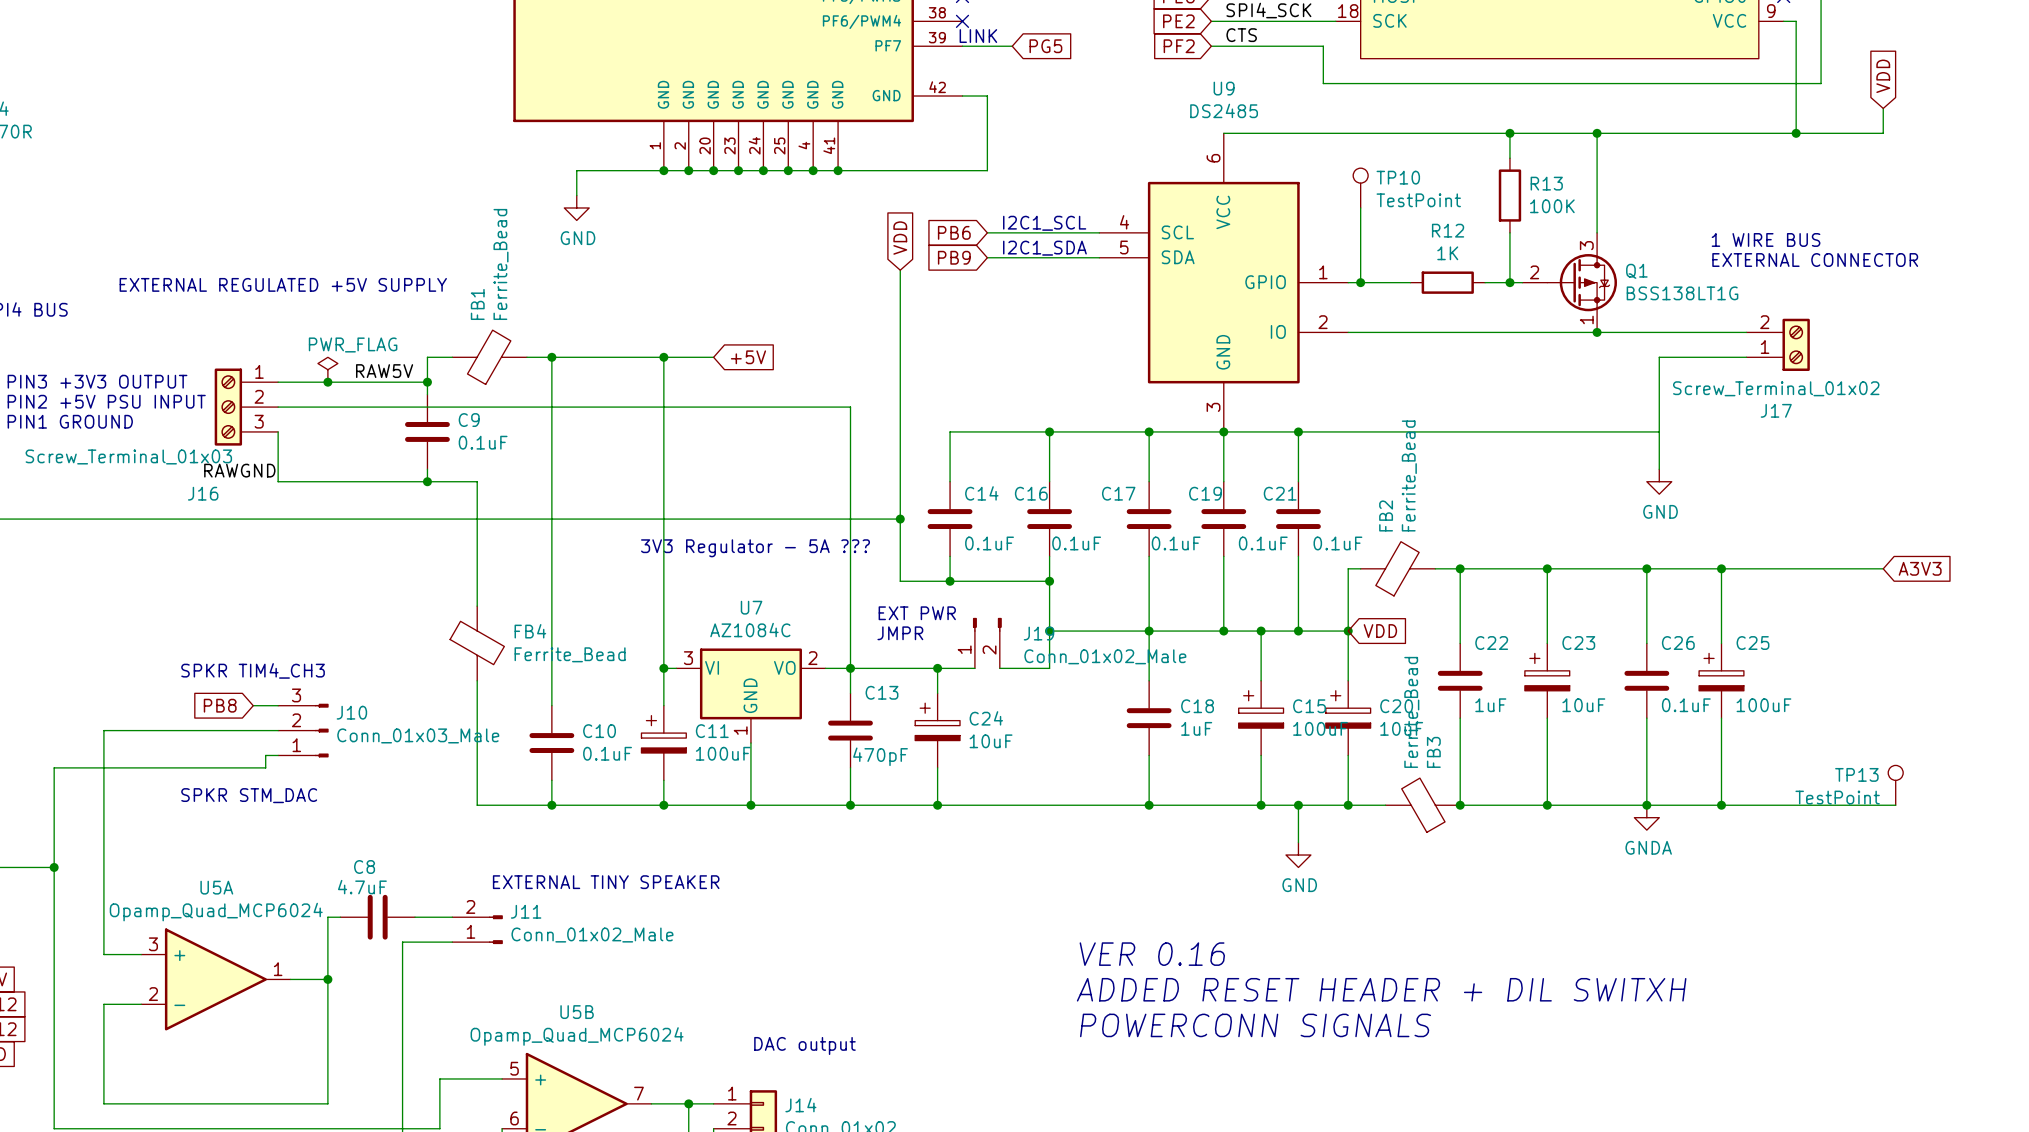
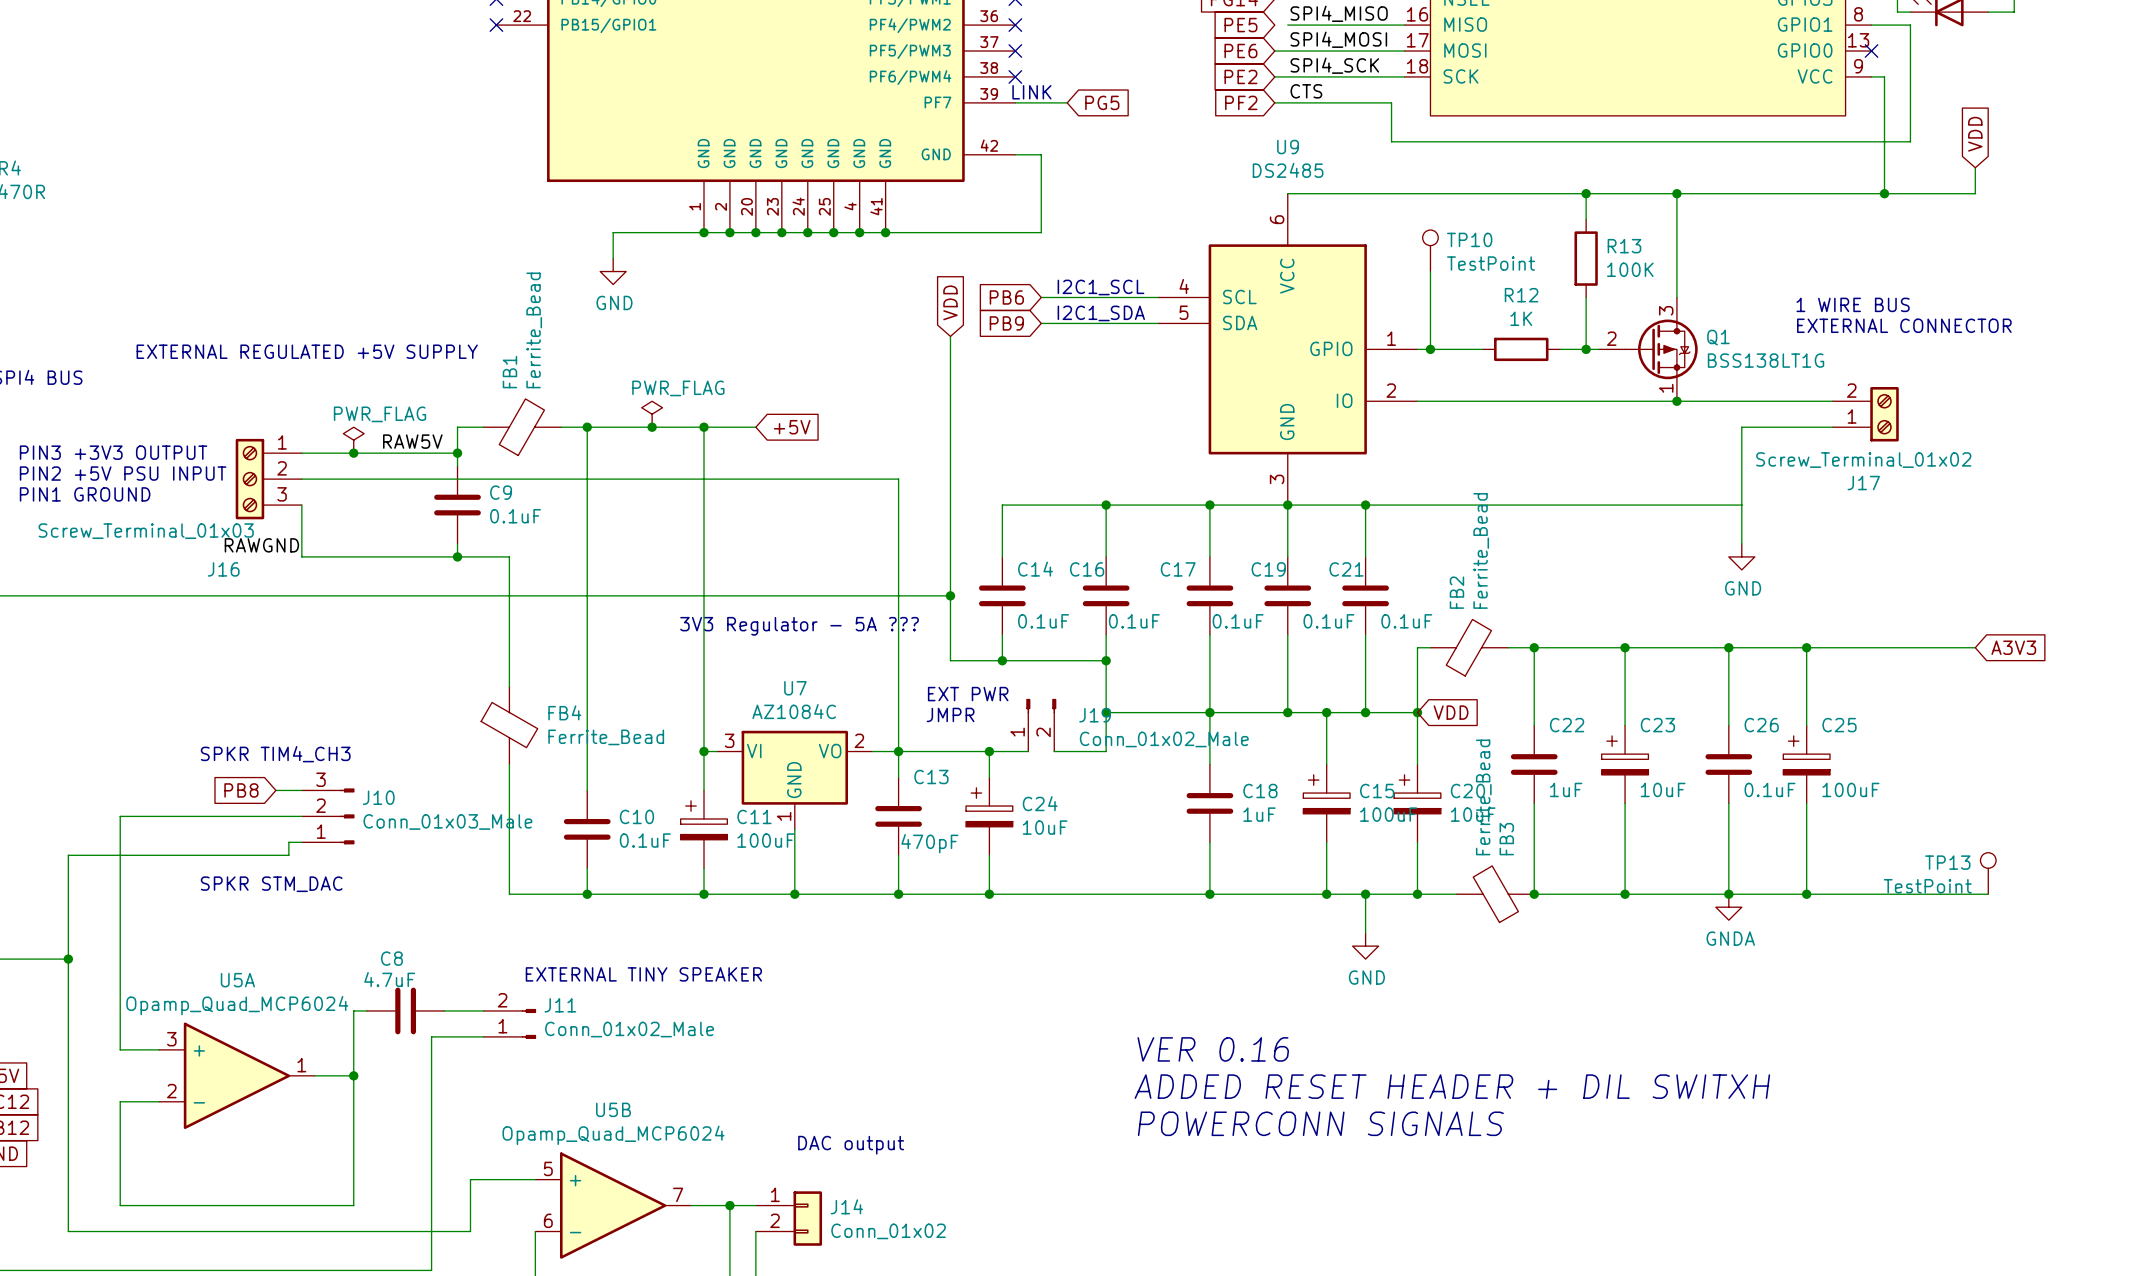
power symbol: none -> PWR_FLAG (652, 414)
junction: none -> (652, 427)

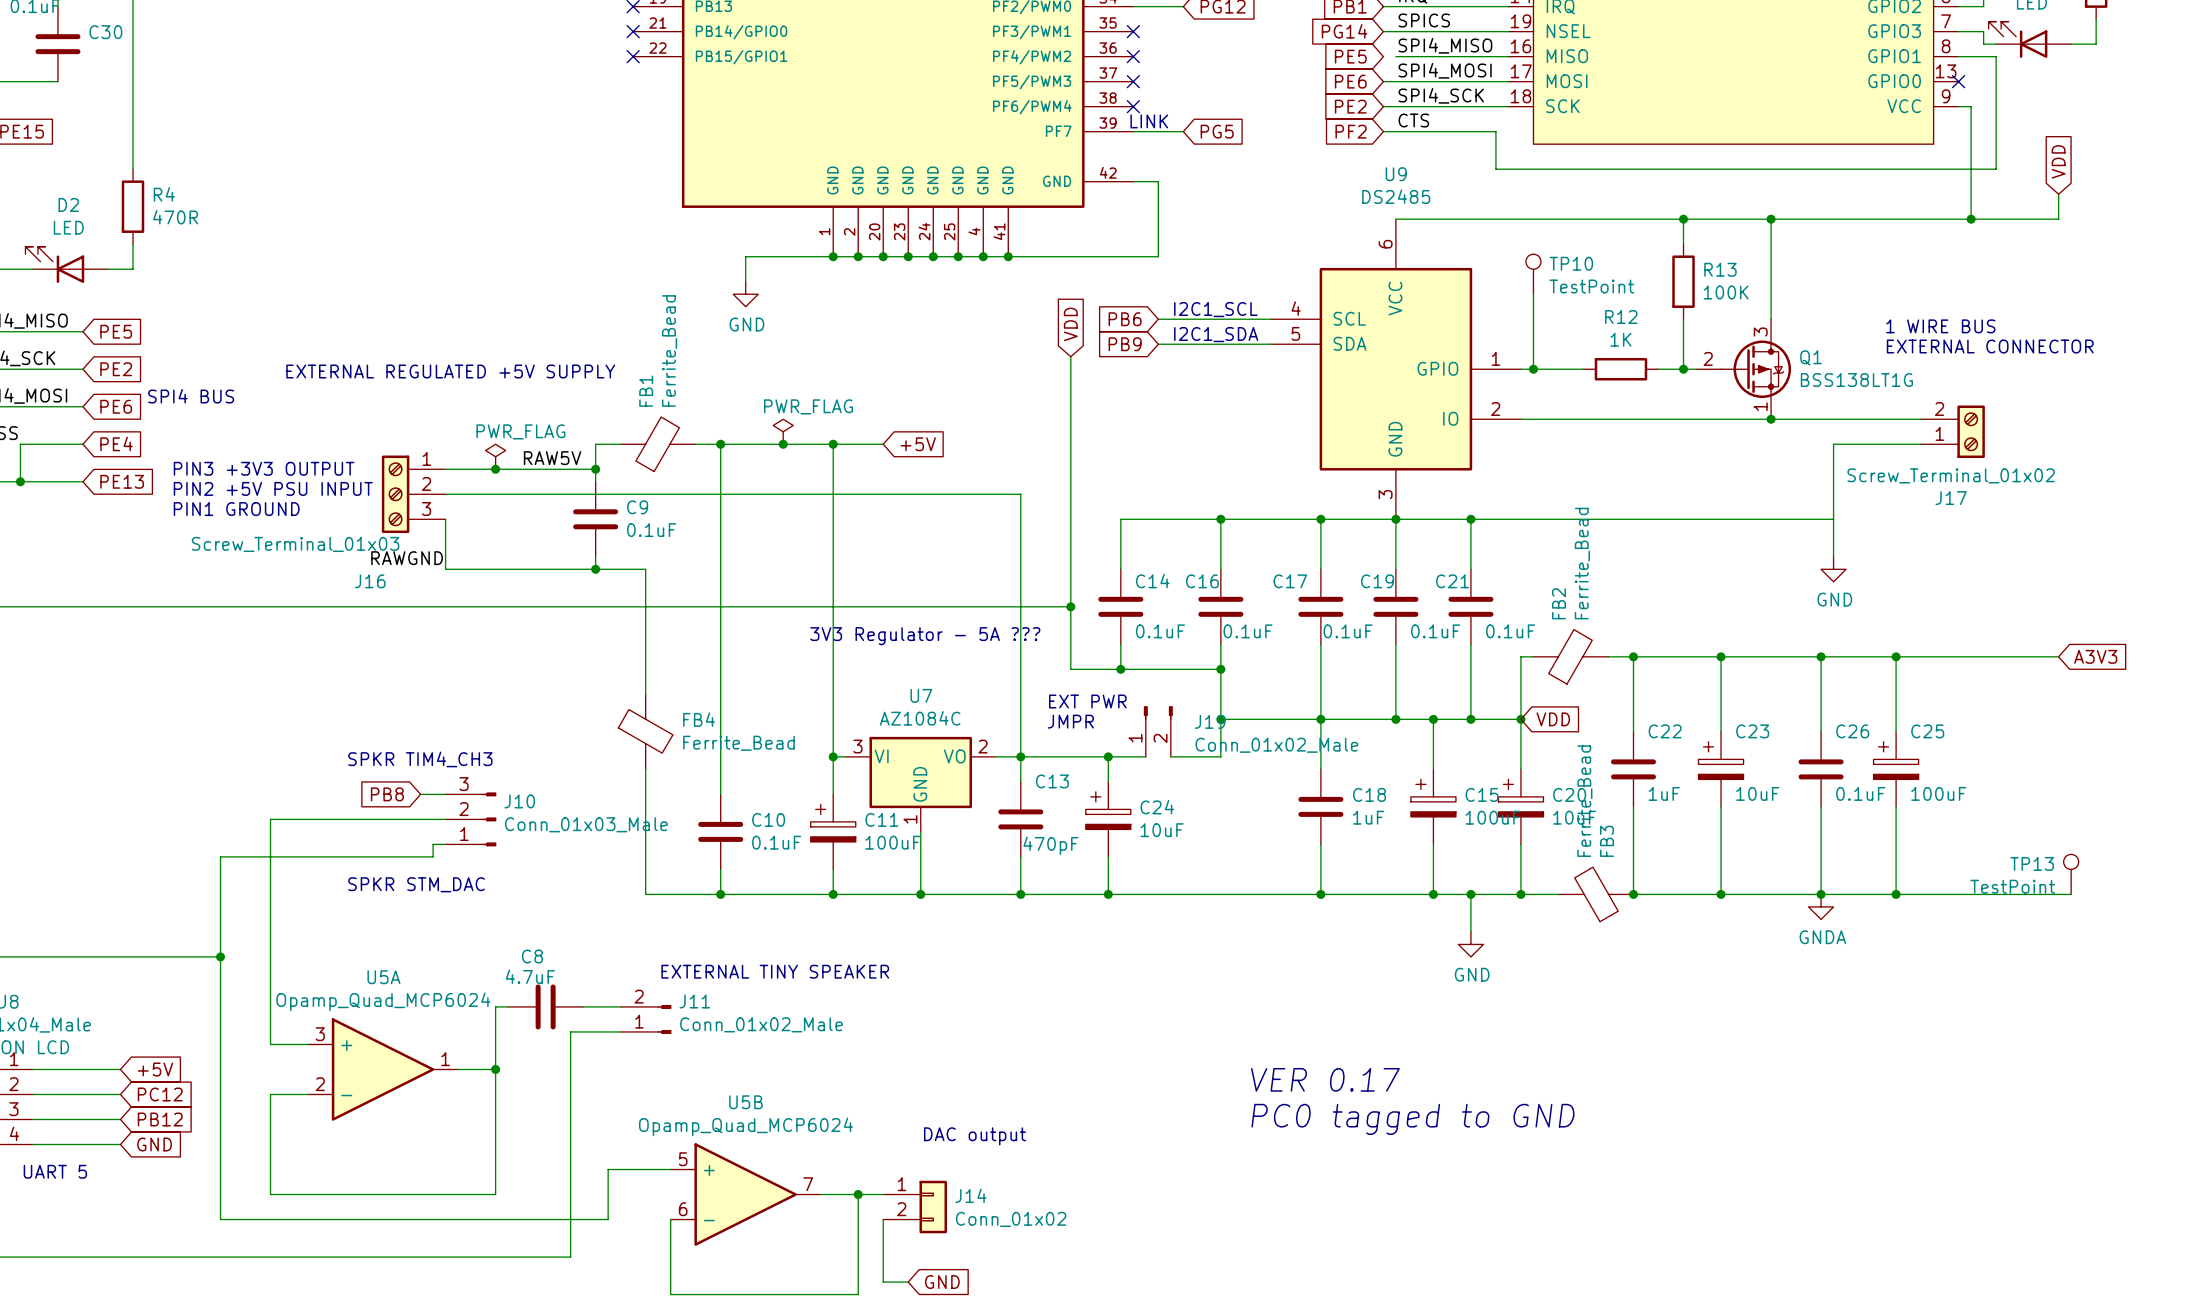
text: VER 0.16 (1213, 1049) -> none
text: ADDED RESET HEADER + DIL SWITXH (1452, 1086) -> VER 0.17 (1325, 1079)
text: POWERCONN SIGNALS (1320, 1123) -> PC0 tagged to GND (1412, 1119)

